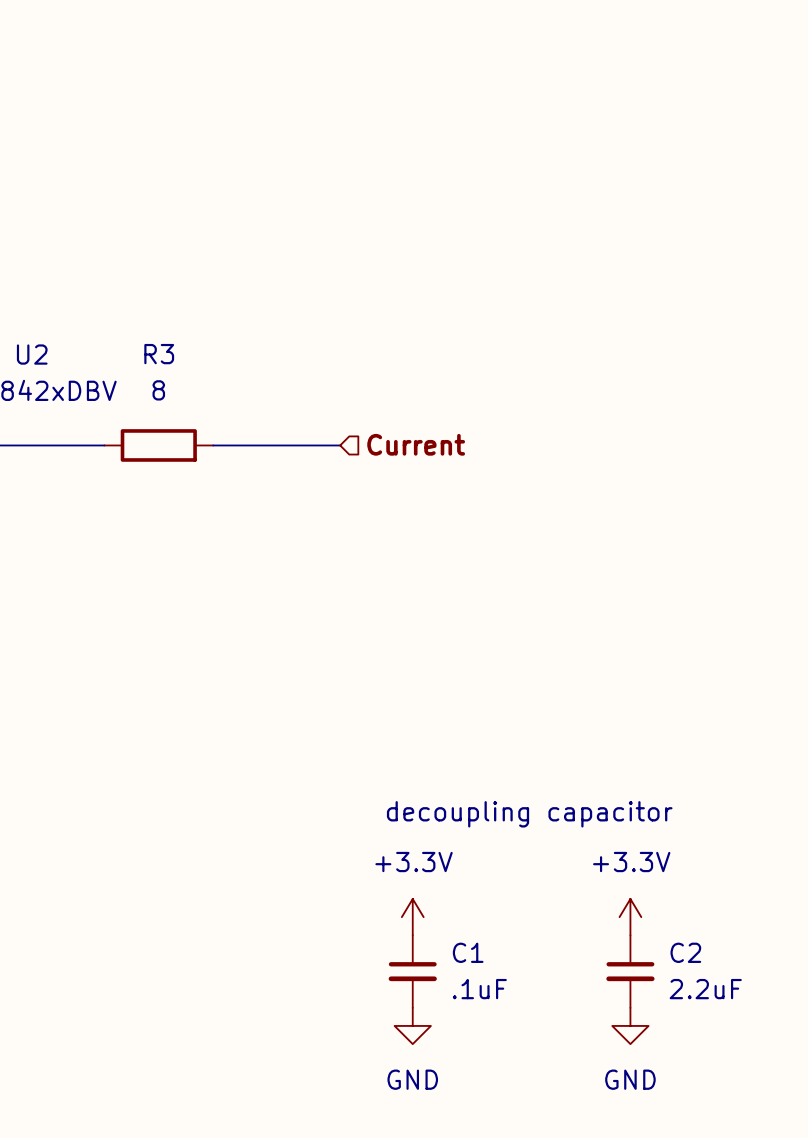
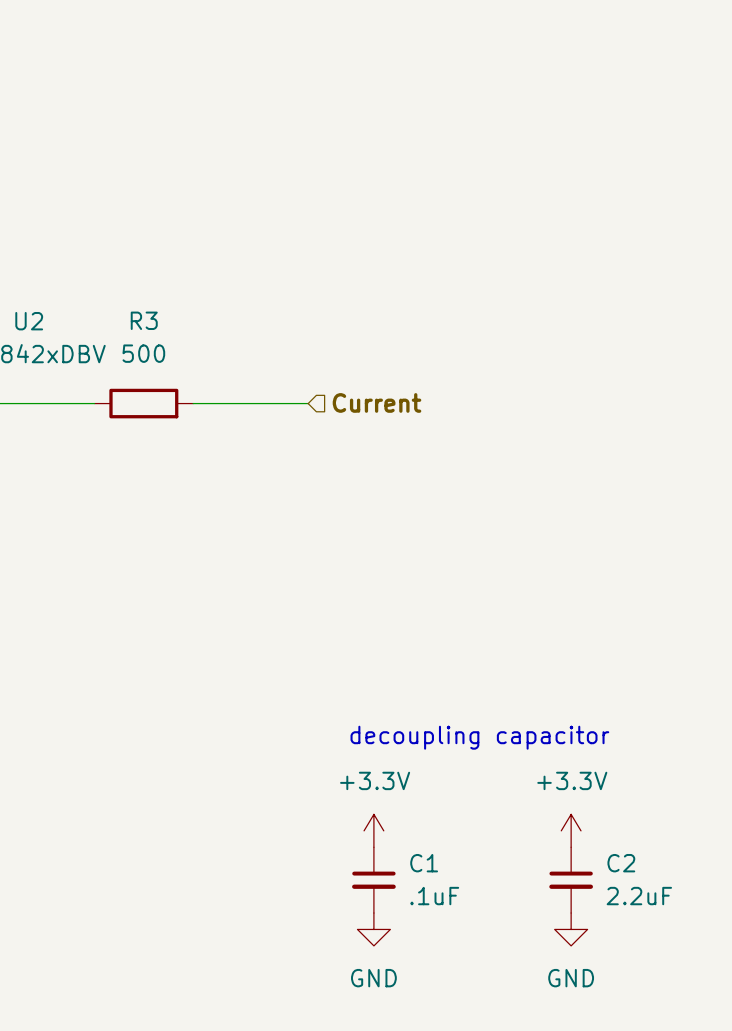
R3 value: 8 (158, 390) -> 500 (143, 353)

